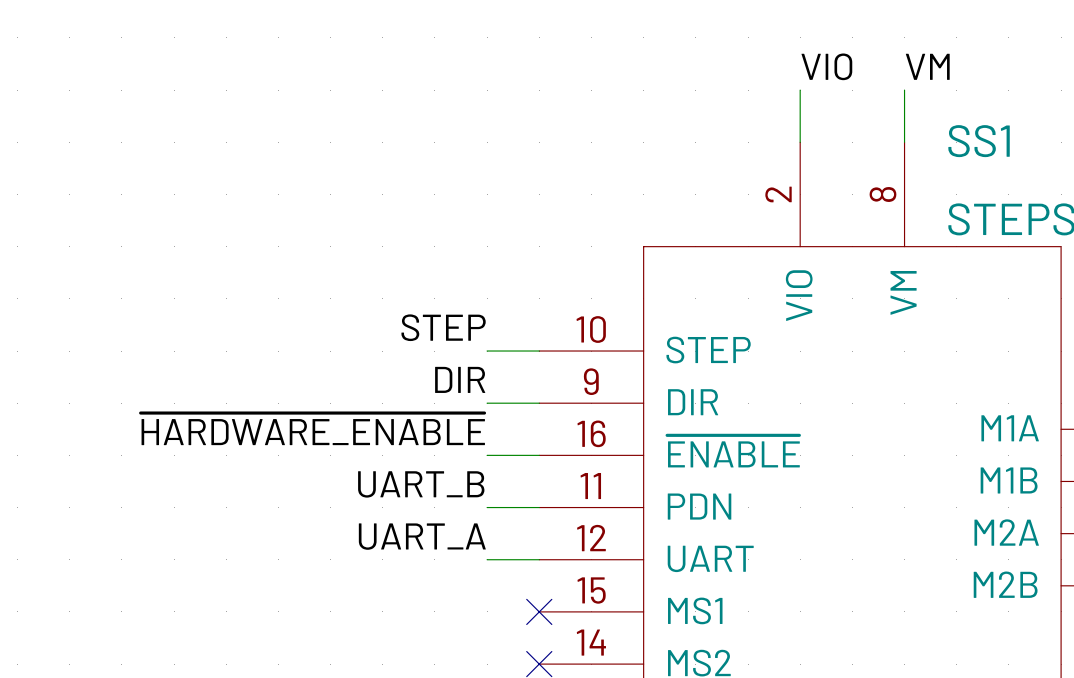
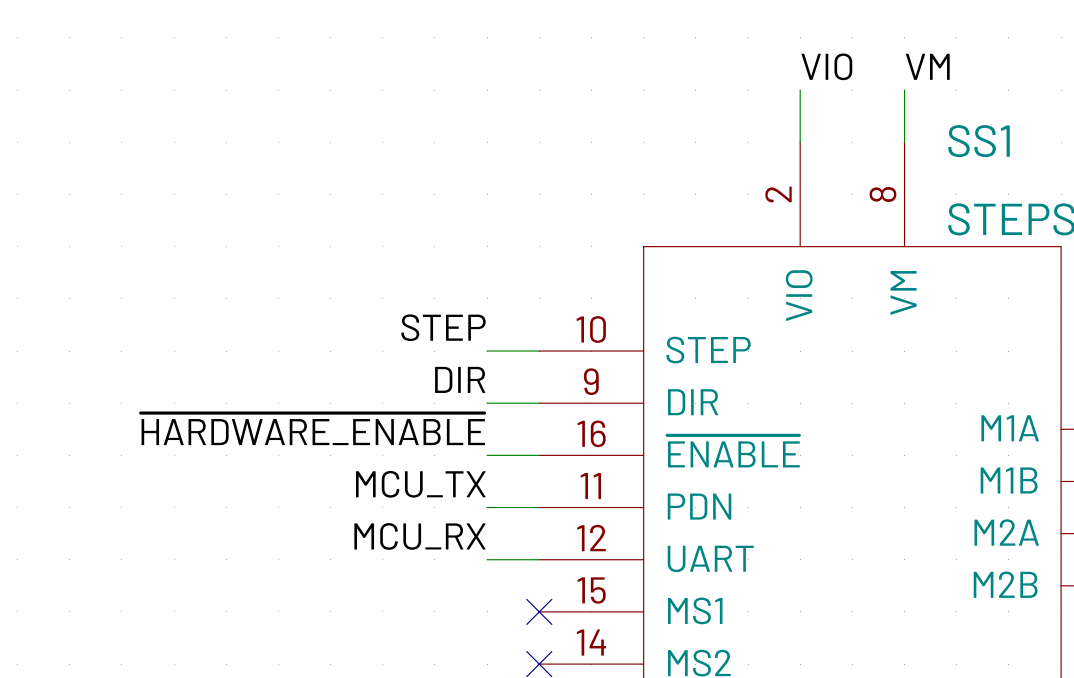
label: UART_B (421, 484) -> MCU_TX (420, 484)
label: UART_A (422, 536) -> MCU_RX (420, 536)

